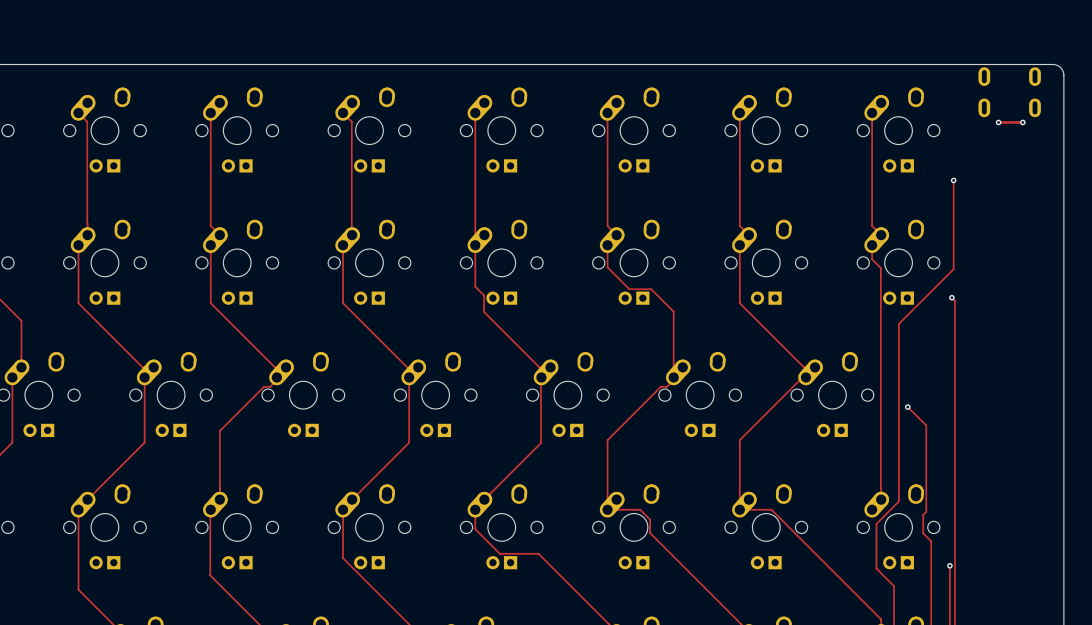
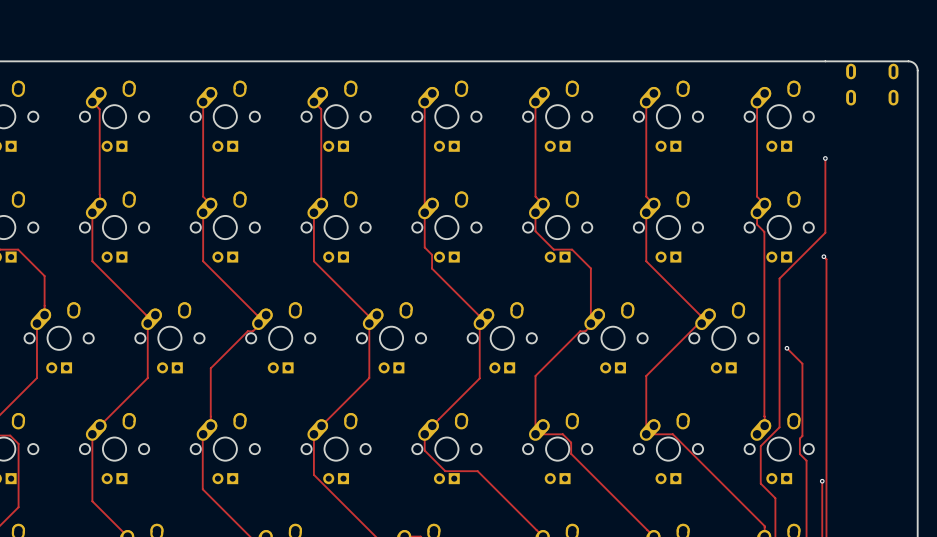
track: (998, 122) (1022, 122) -> none
via: (998, 122) -> none
via: (1022, 122) -> none

